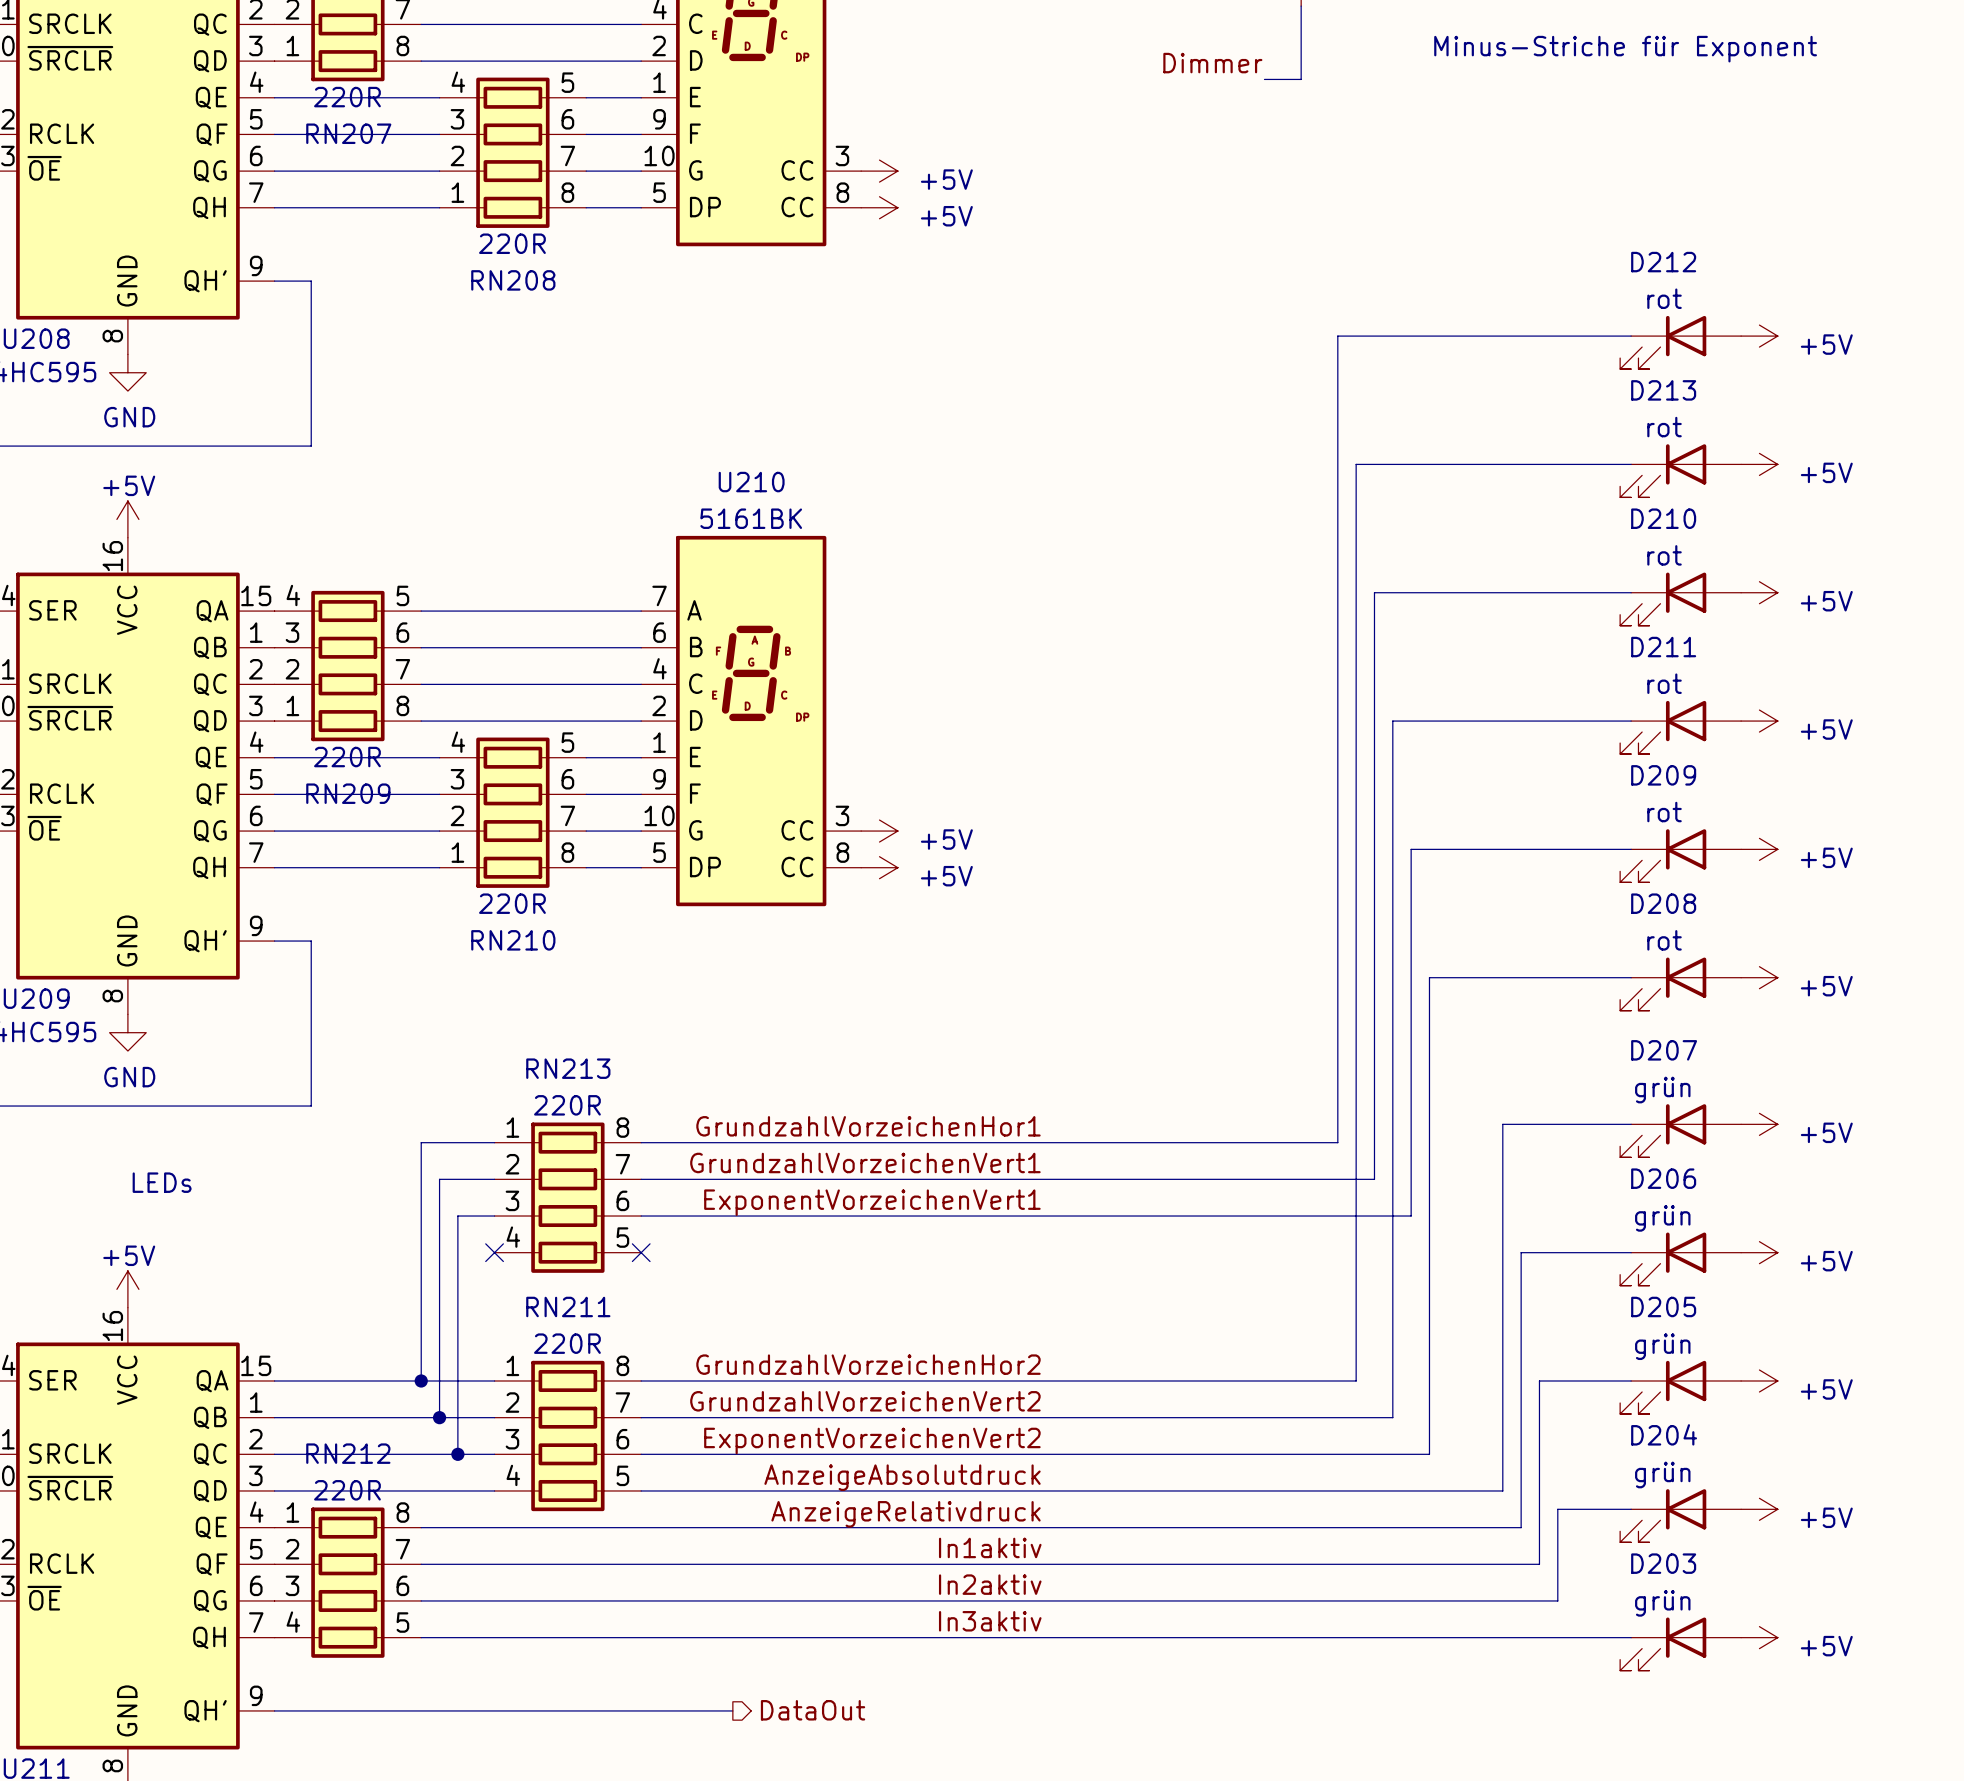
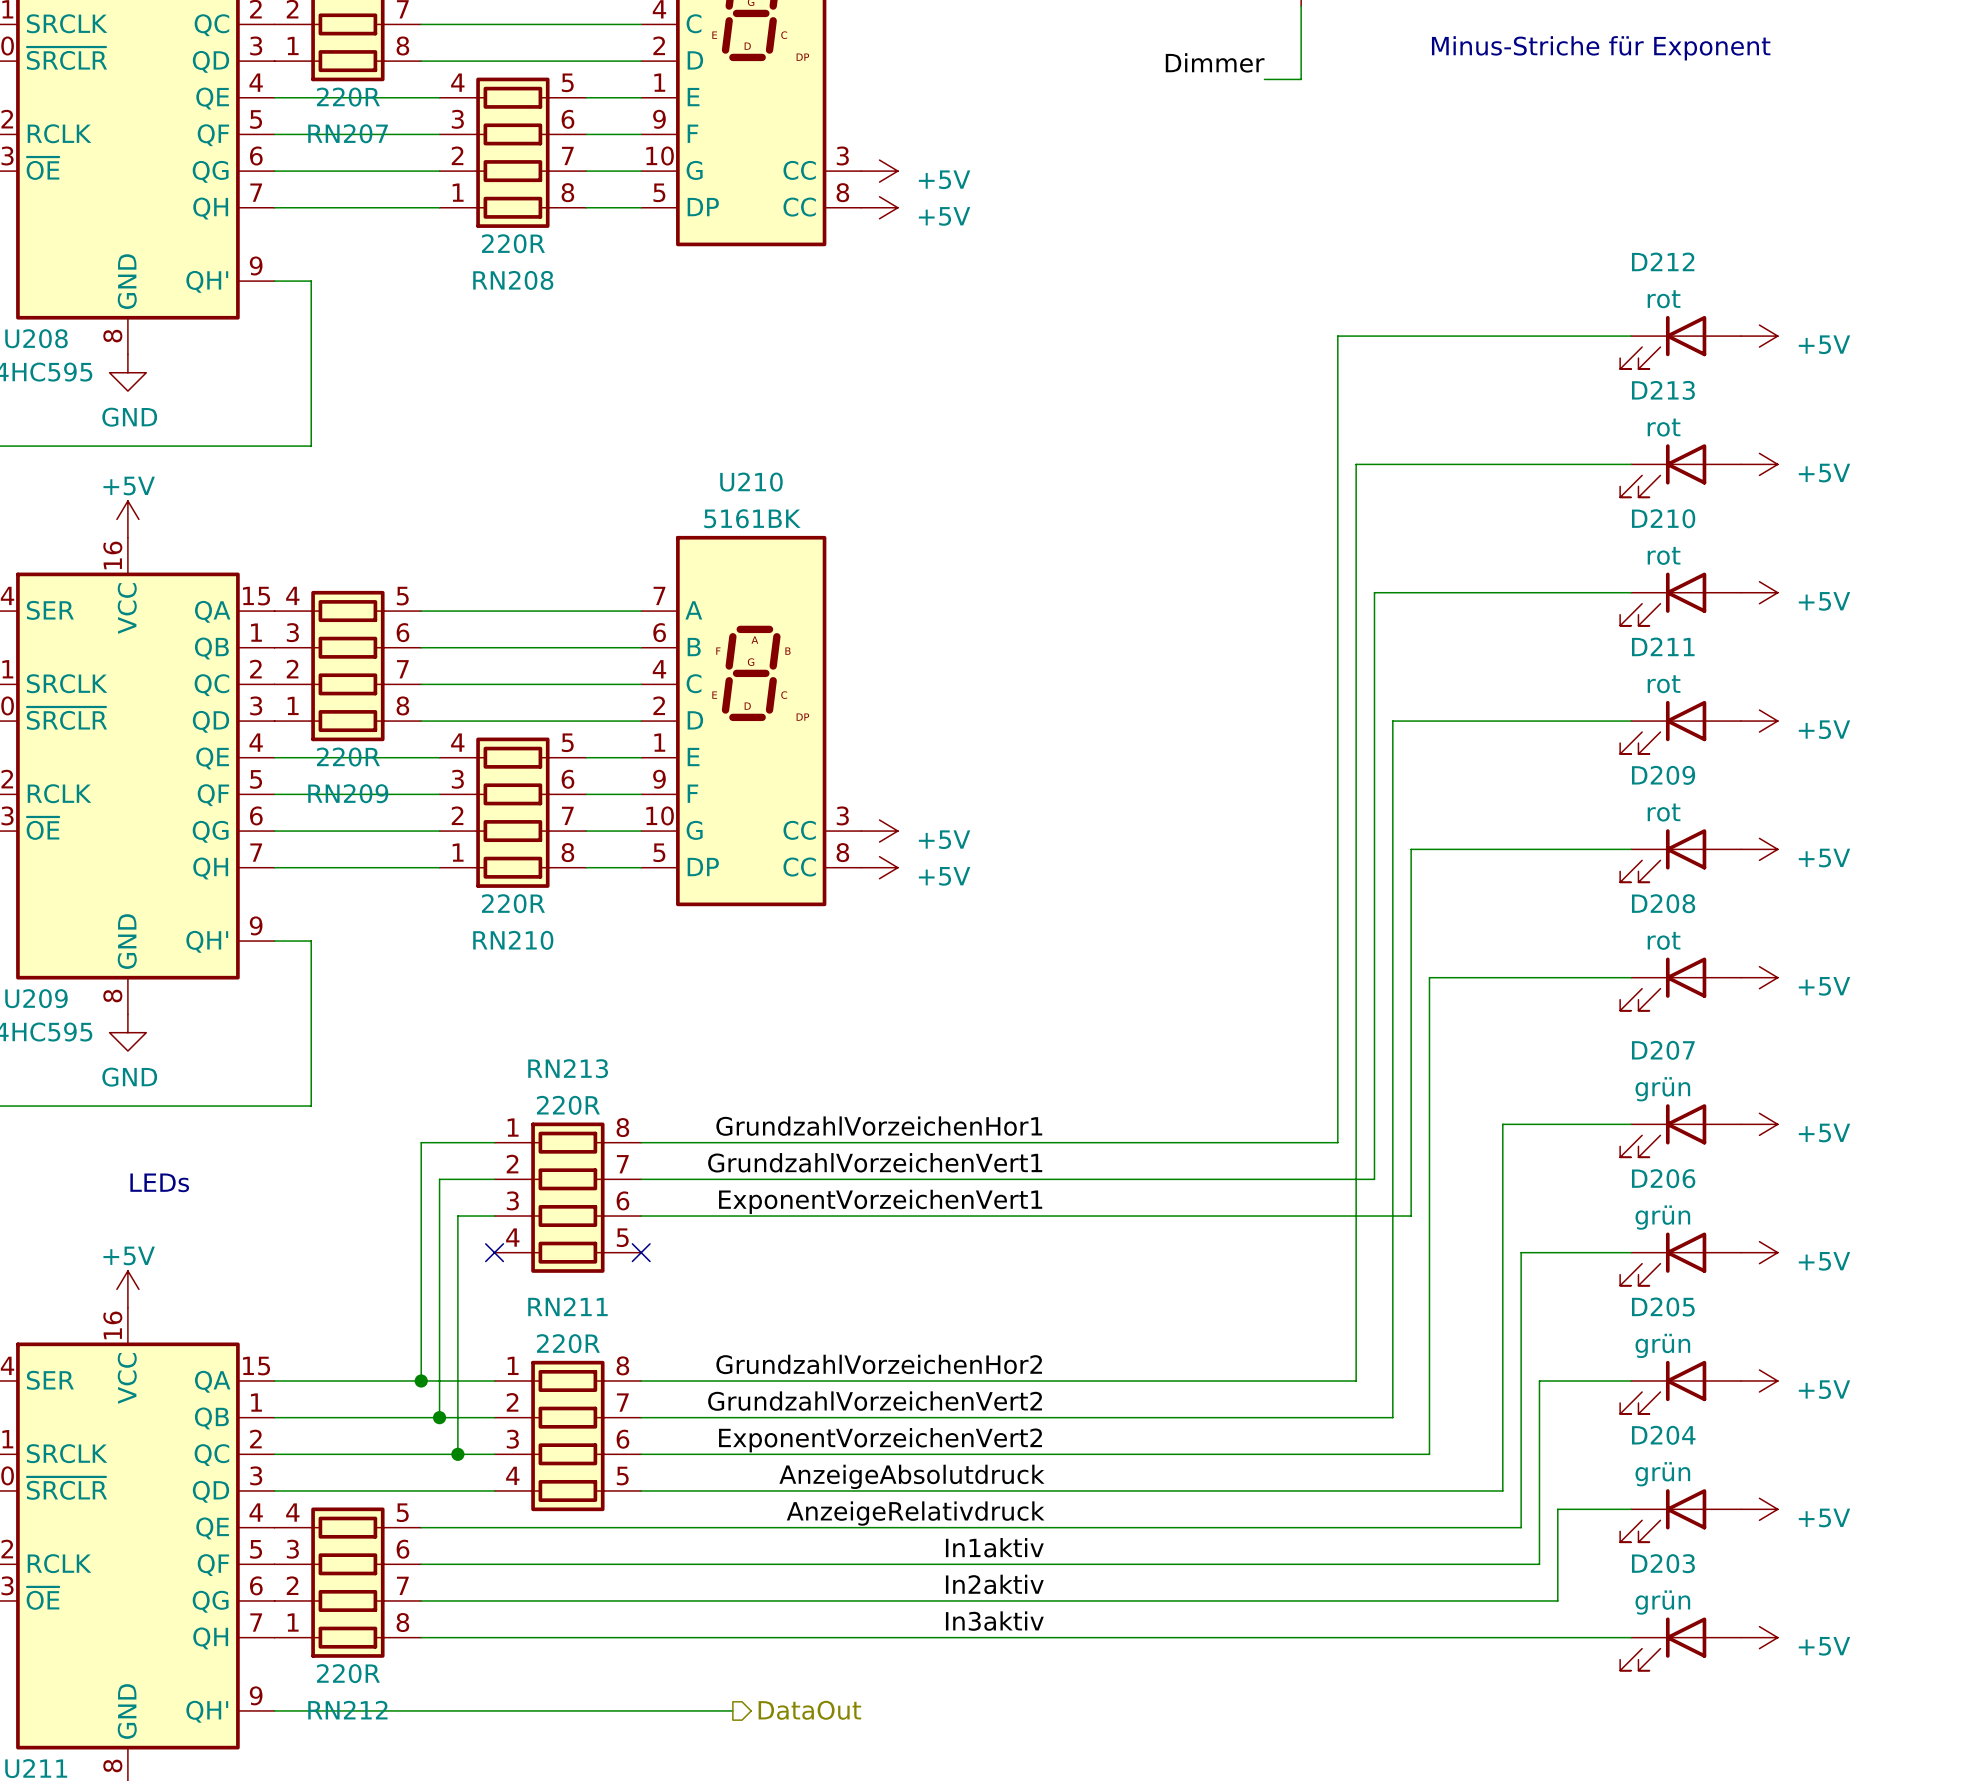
RN212 flip: as is (347, 1582) -> up-down (347, 1582)

